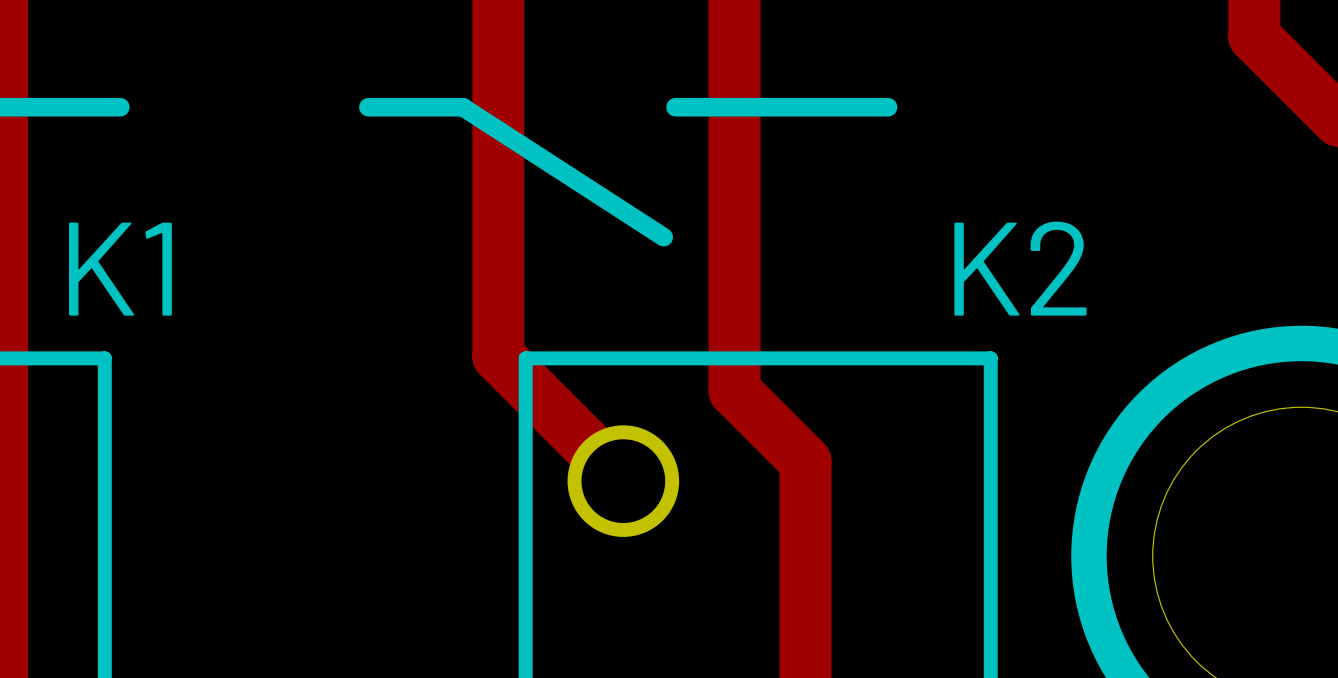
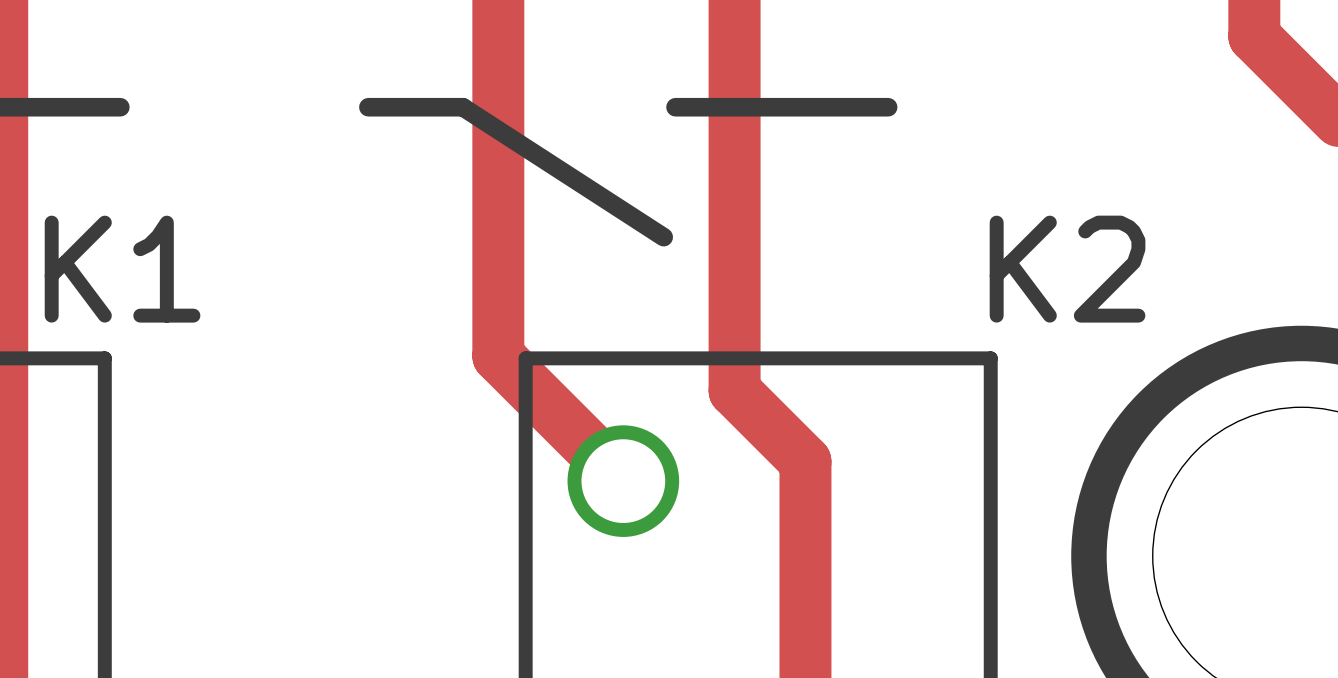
K2 name position: K2 (1020, 268) -> K2 (1067, 269)

